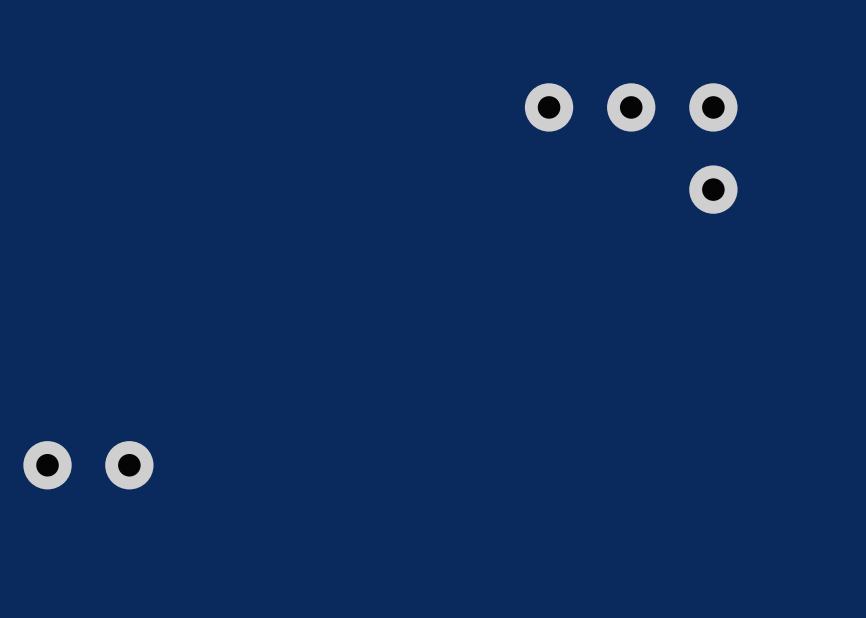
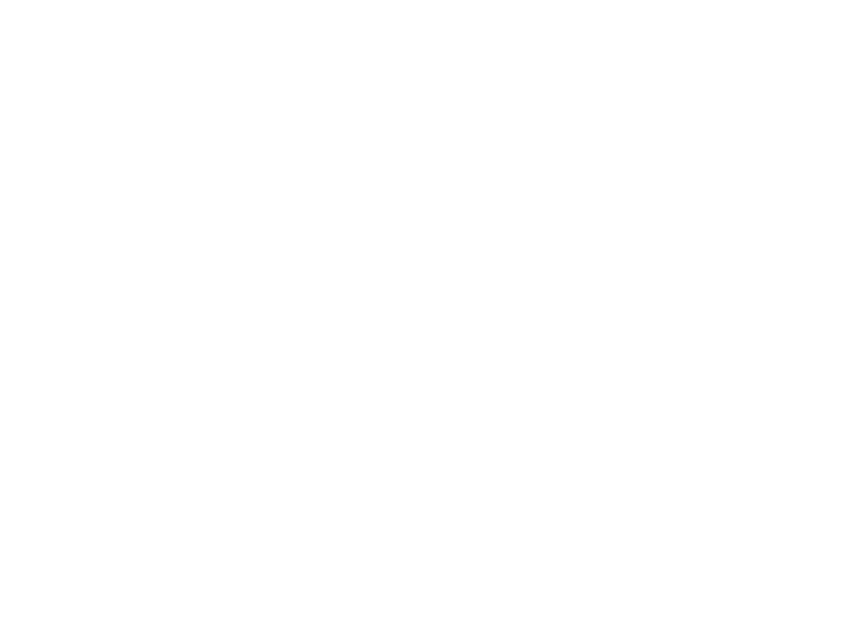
part: (549, 107) -> none
part: (631, 107) -> none
part: (713, 107) -> none
part: (713, 189) -> none
part: (47, 465) -> none
part: (129, 465) -> none

